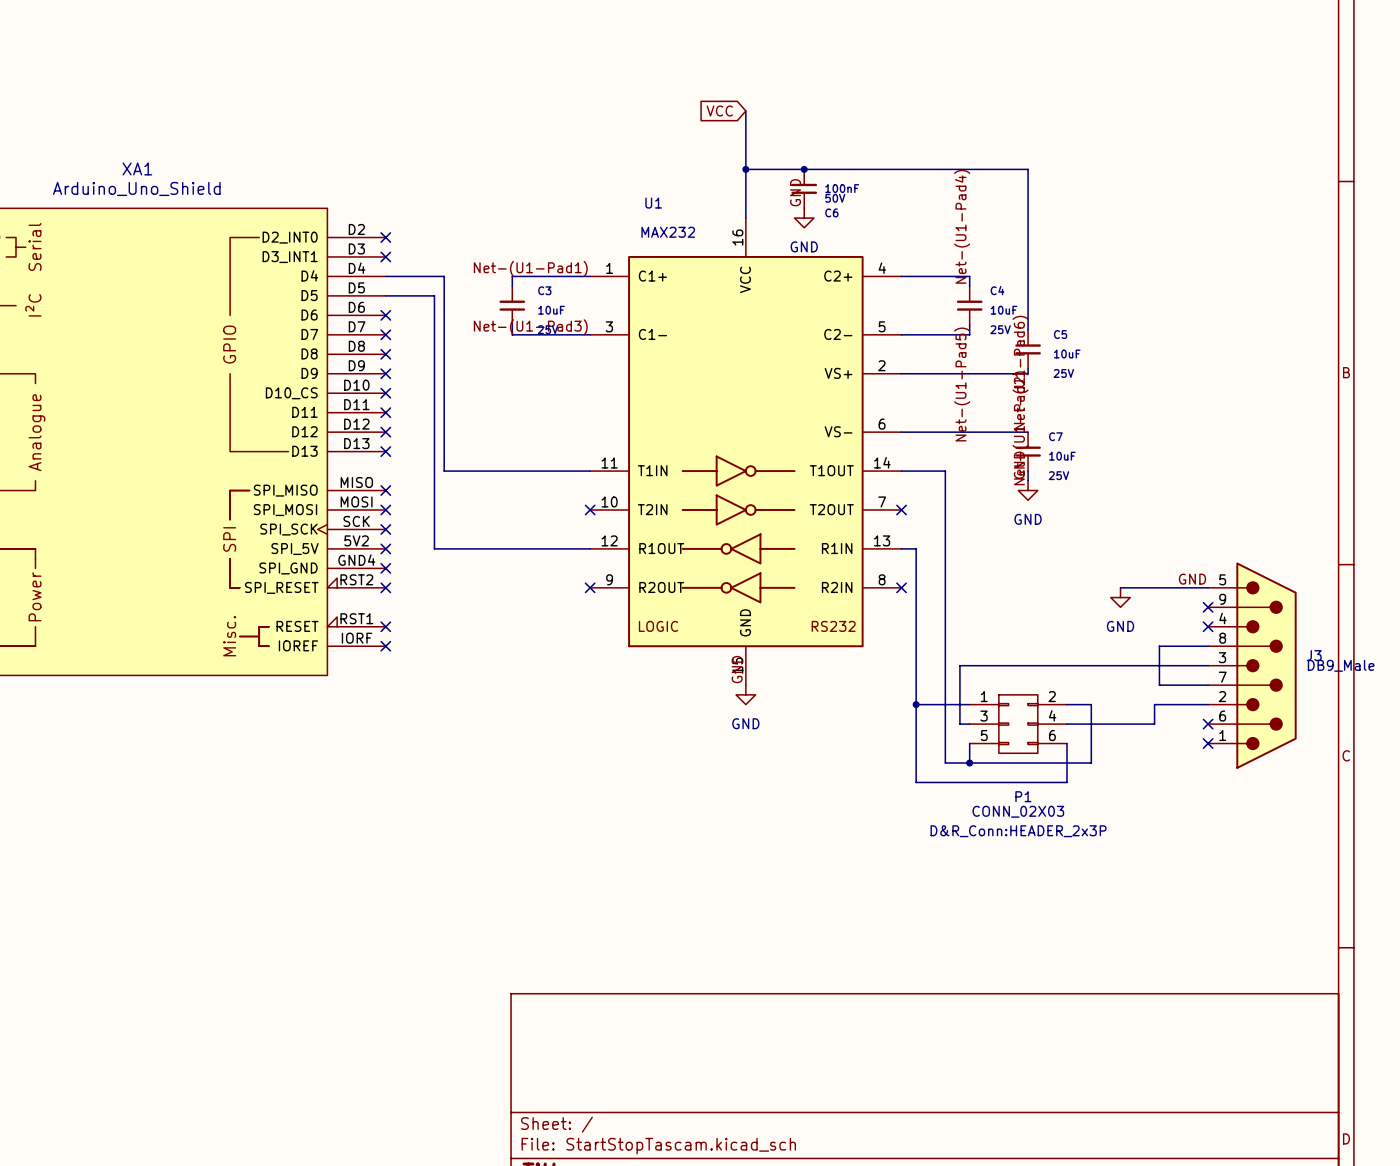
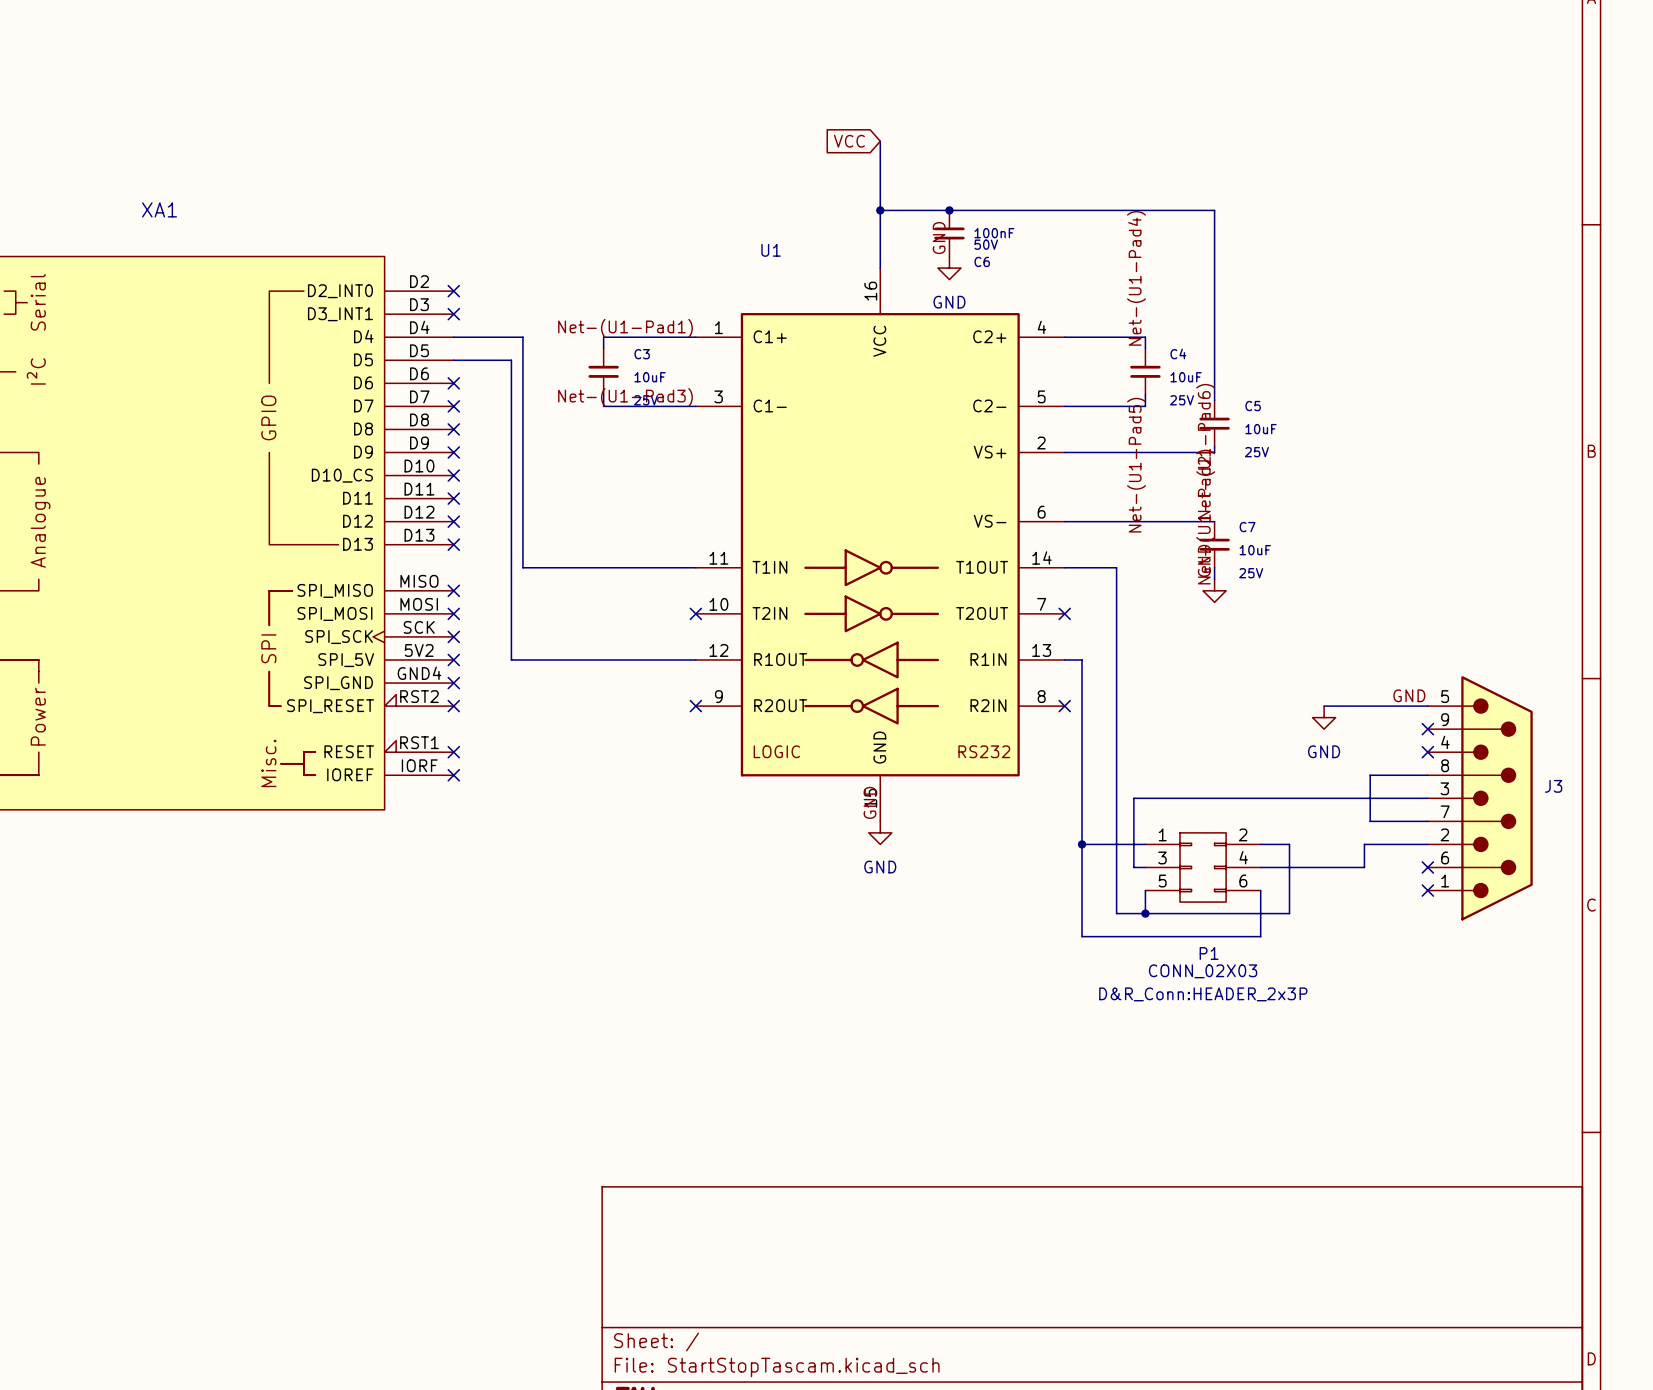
XA1 value: Arduino_Uno_Shield (136, 188) -> none
U1 value: MAX232 (668, 232) -> none
power symbol text: GND (1028, 519) -> none
J3 value: DB9_Male (1341, 665) -> none

